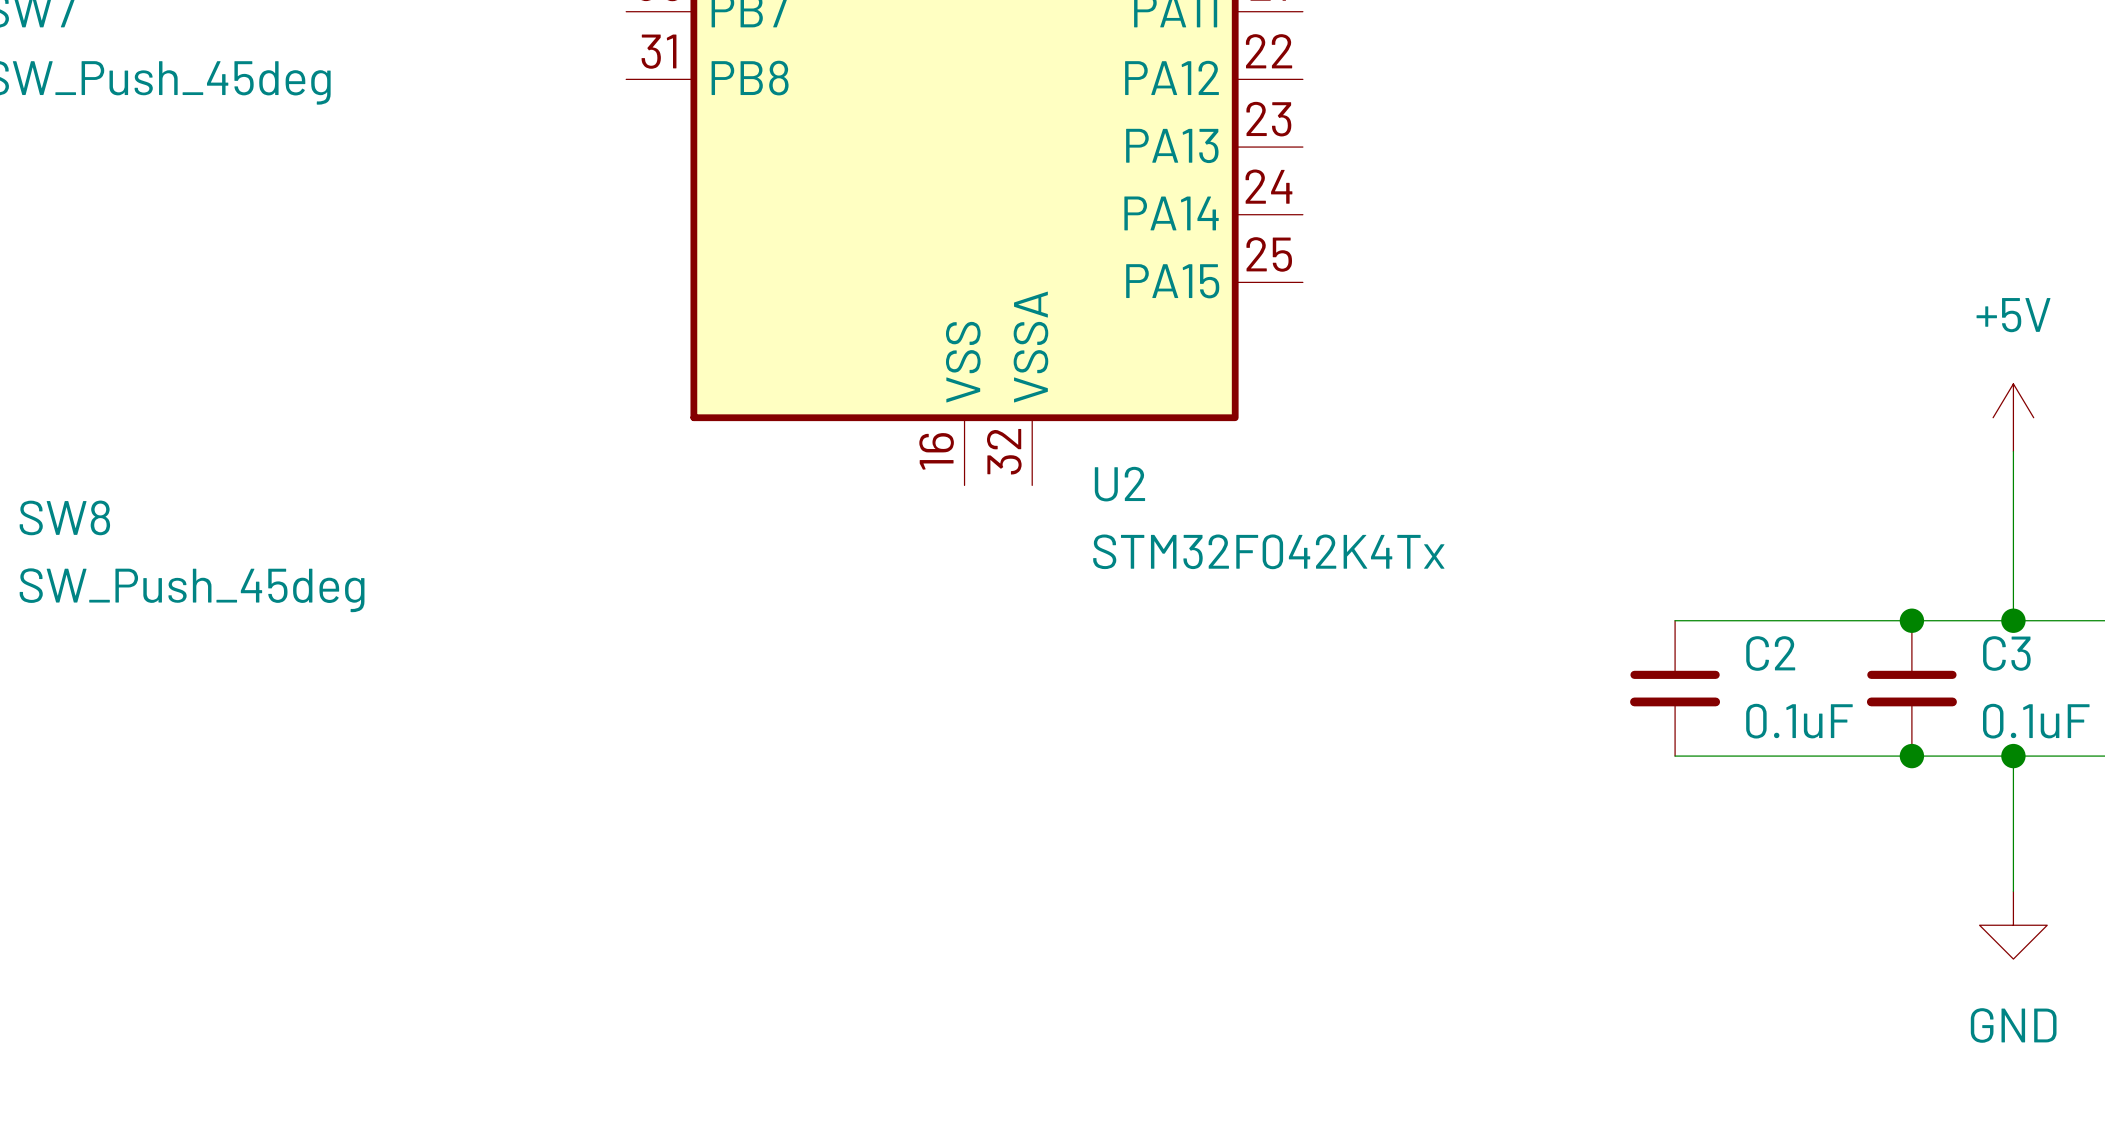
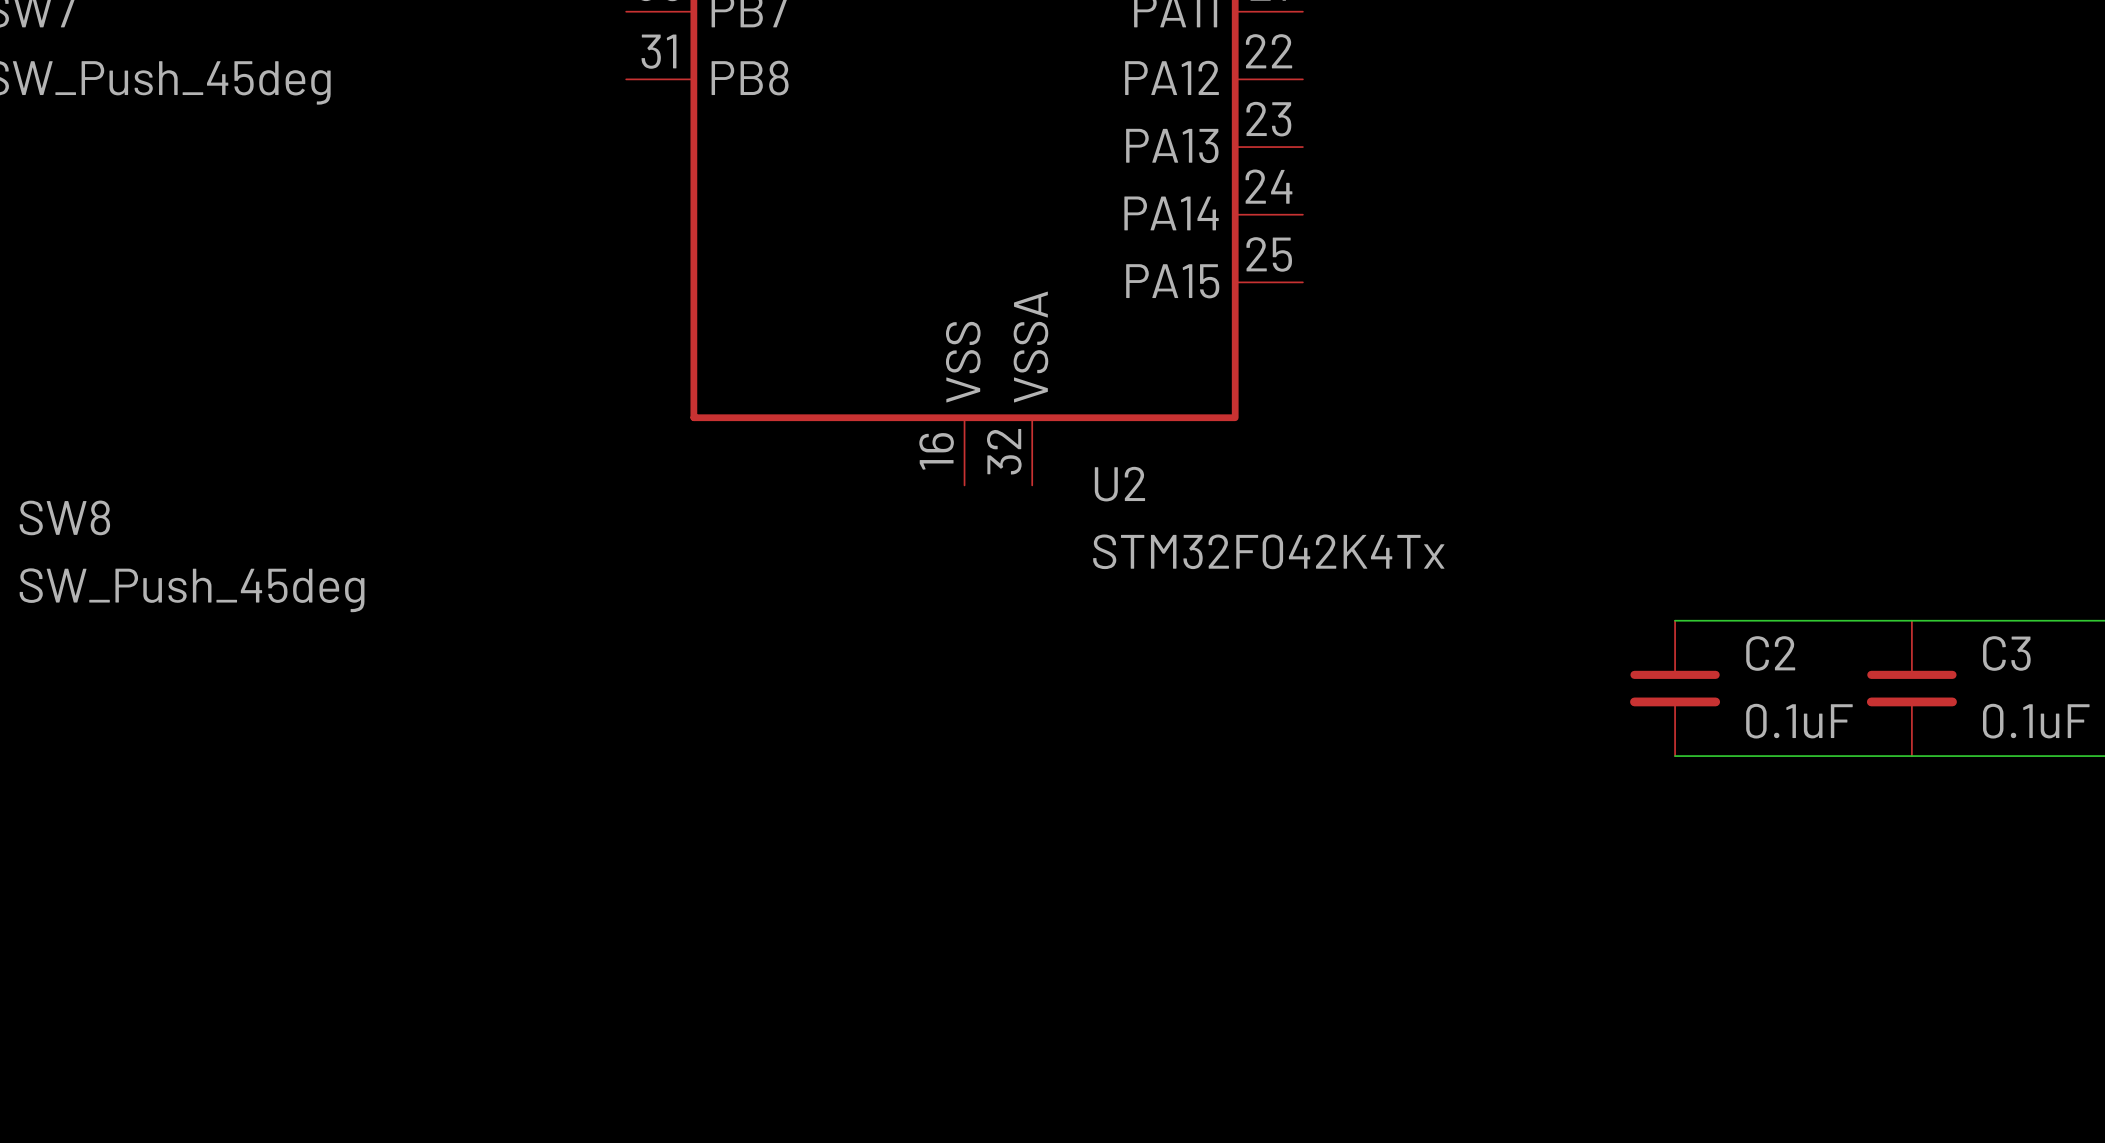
power symbol: +5V (2013, 417) -> none
wire: (2013, 451) (2013, 620) -> none
junction: (1911, 620) -> none
junction: (2013, 620) -> none
junction: (1911, 756) -> none
wire: (2013, 756) (2013, 891) -> none
junction: (2013, 756) -> none
power symbol: GND (2013, 925) -> none

